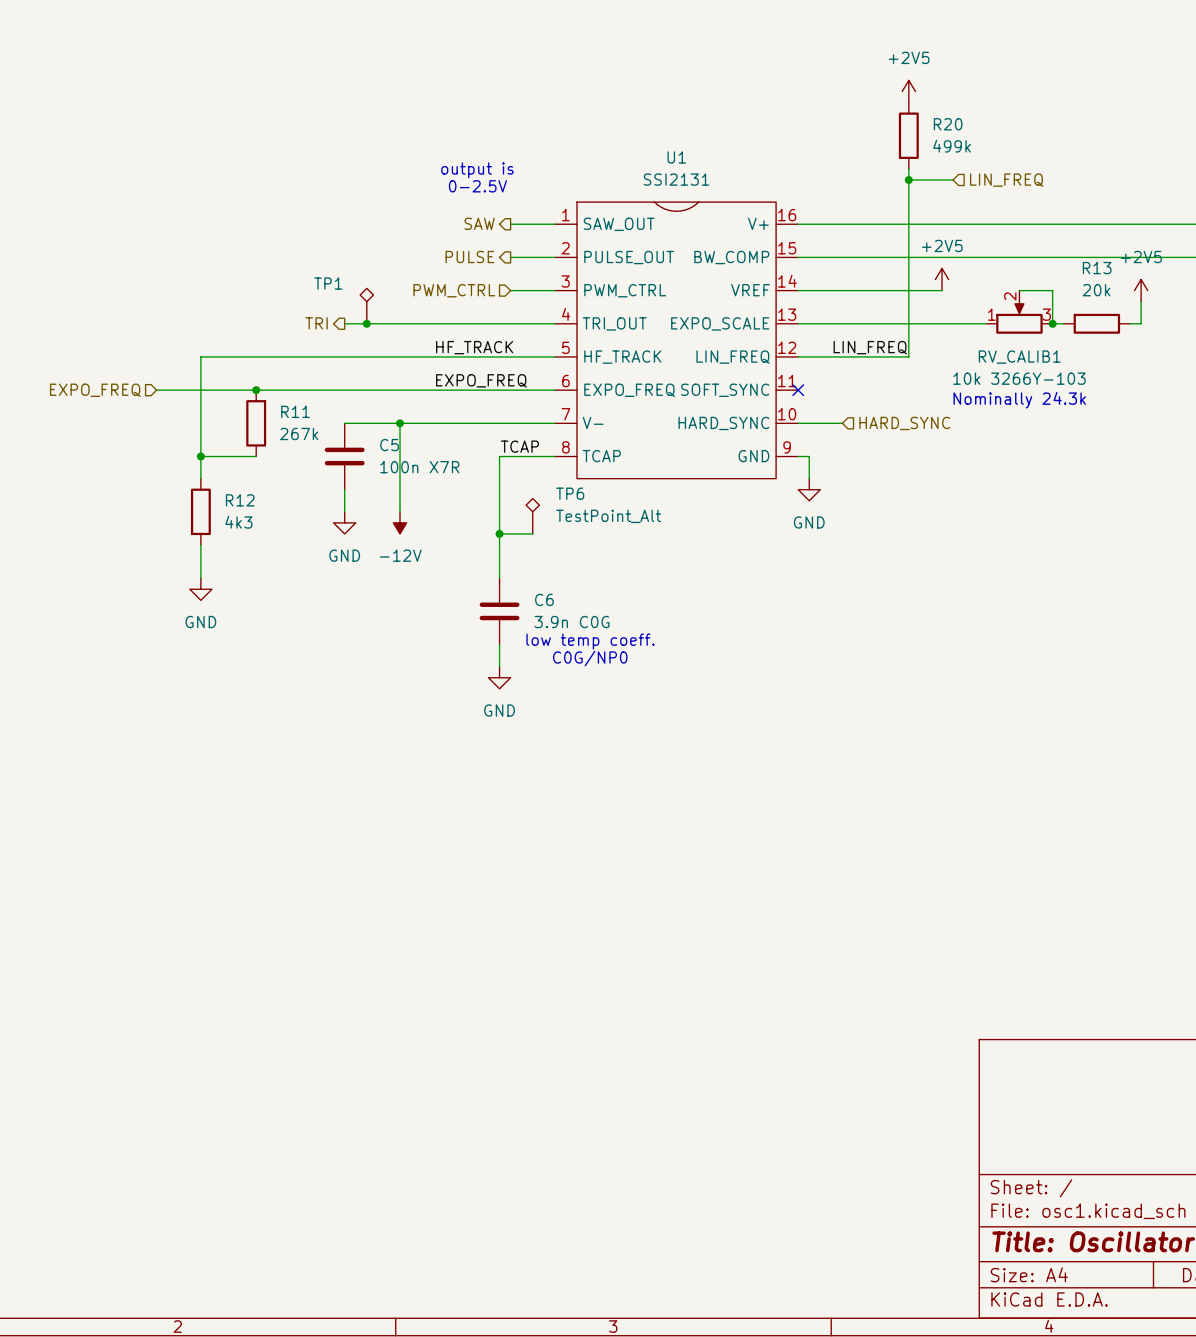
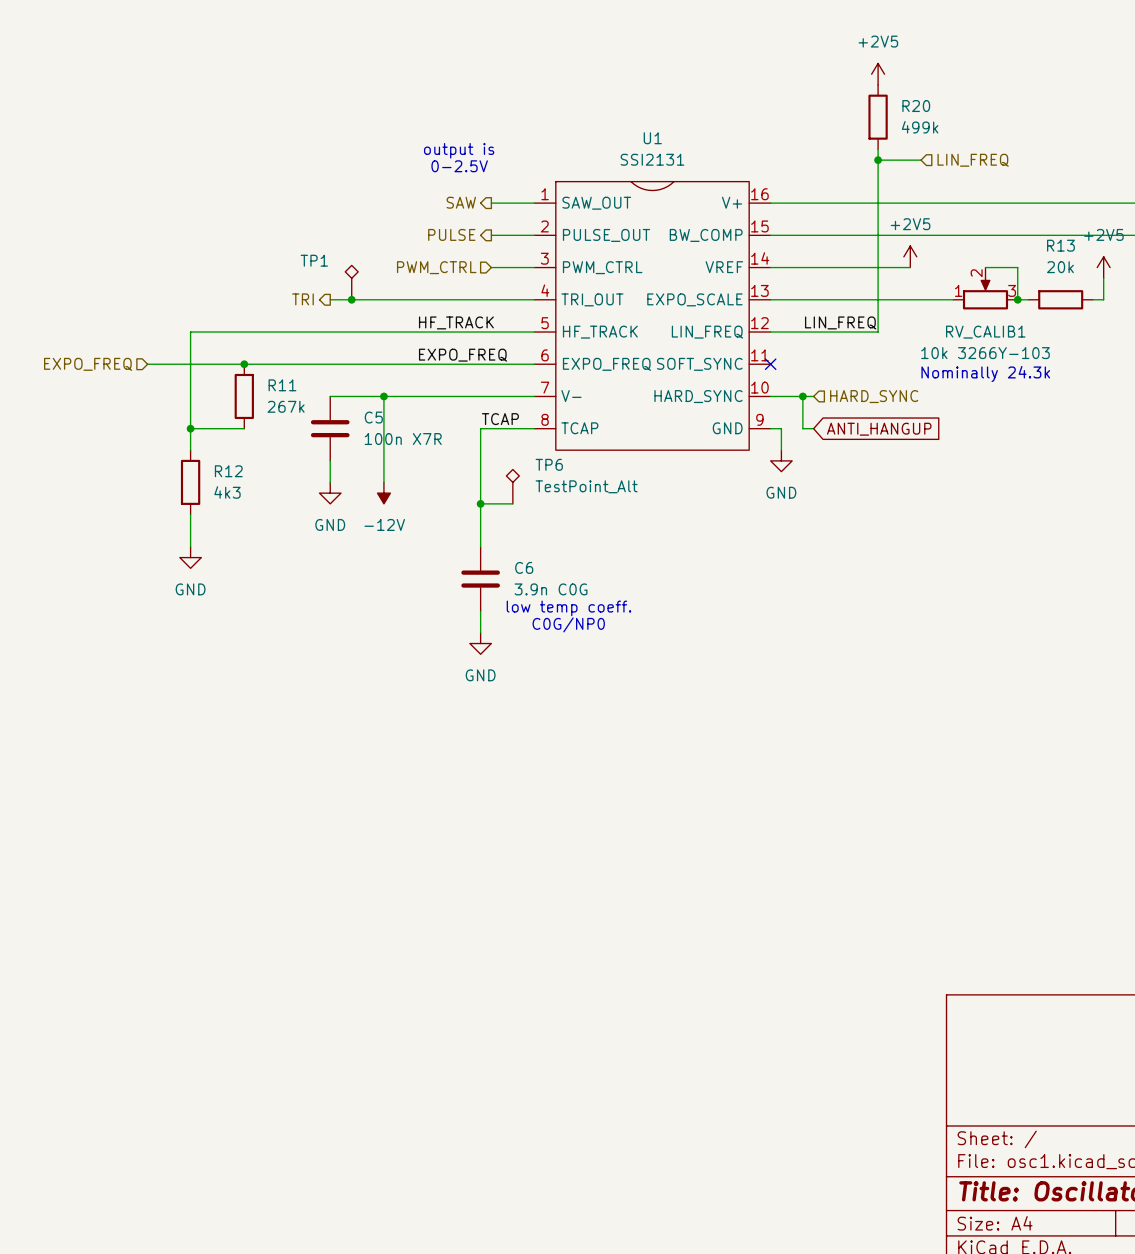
wire: none -> (802, 396) (802, 428) (813, 428)
junction: none -> (802, 396)
global label: none -> ANTI_HANGUP (879, 429)

